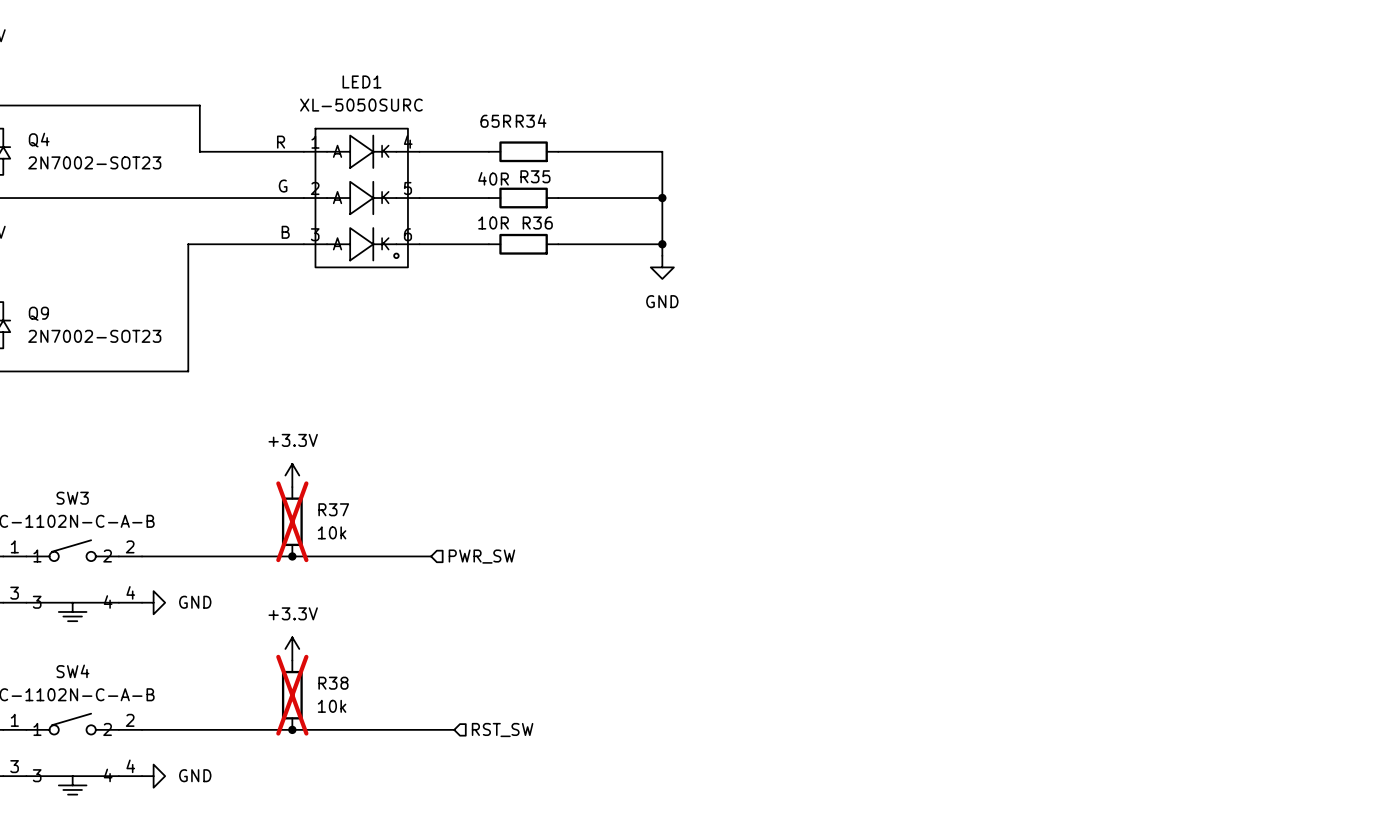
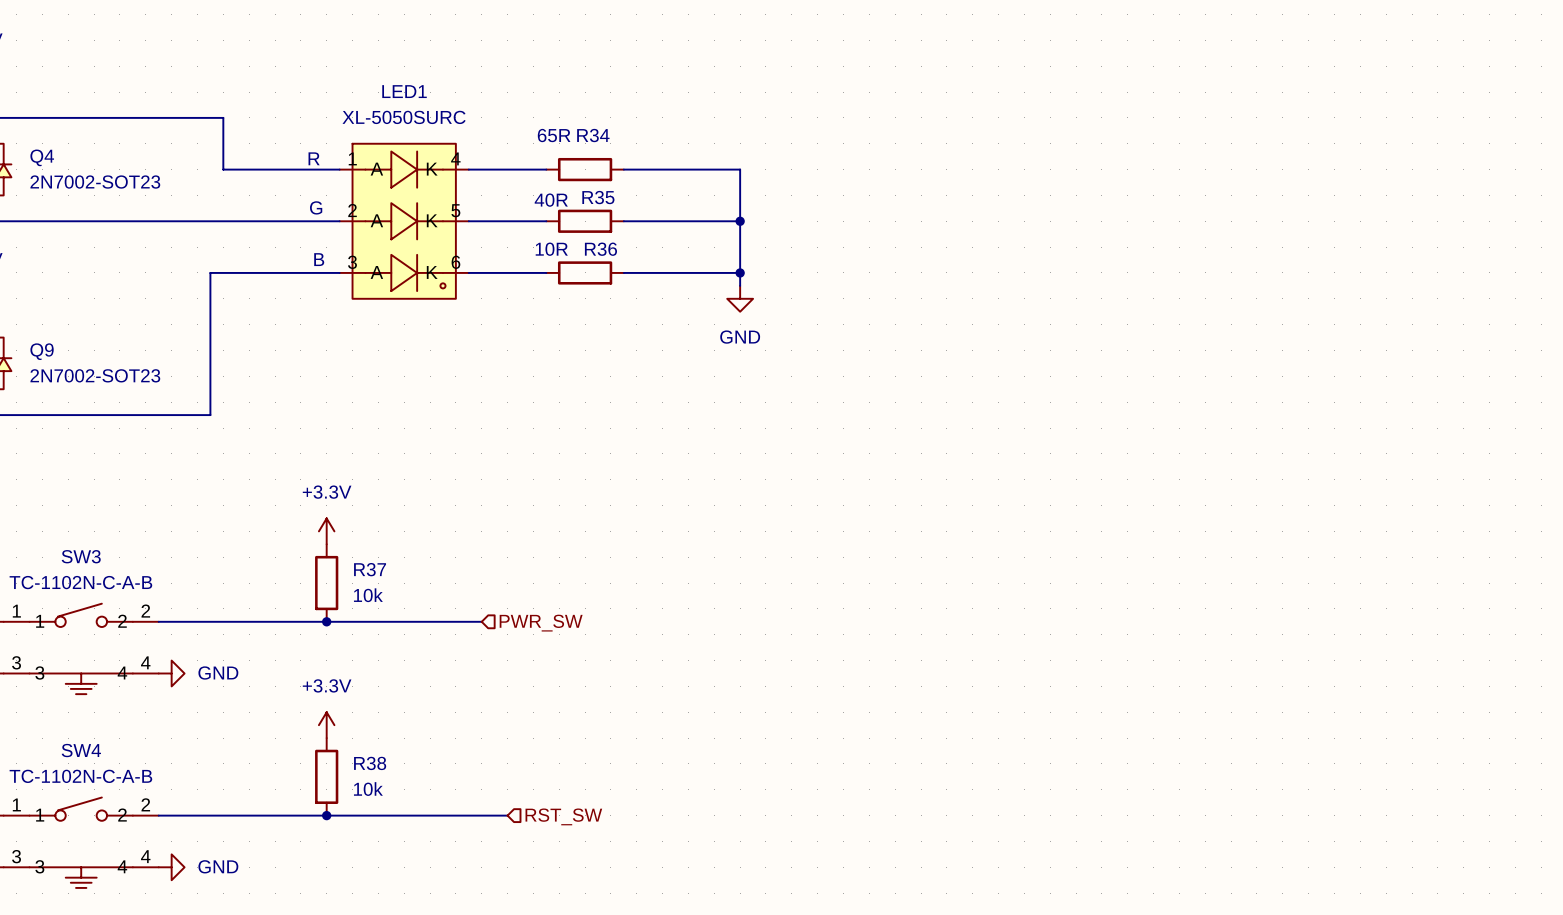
R37 do-not-place cross: (292, 521) -> none
R38 do-not-place cross: (292, 695) -> none

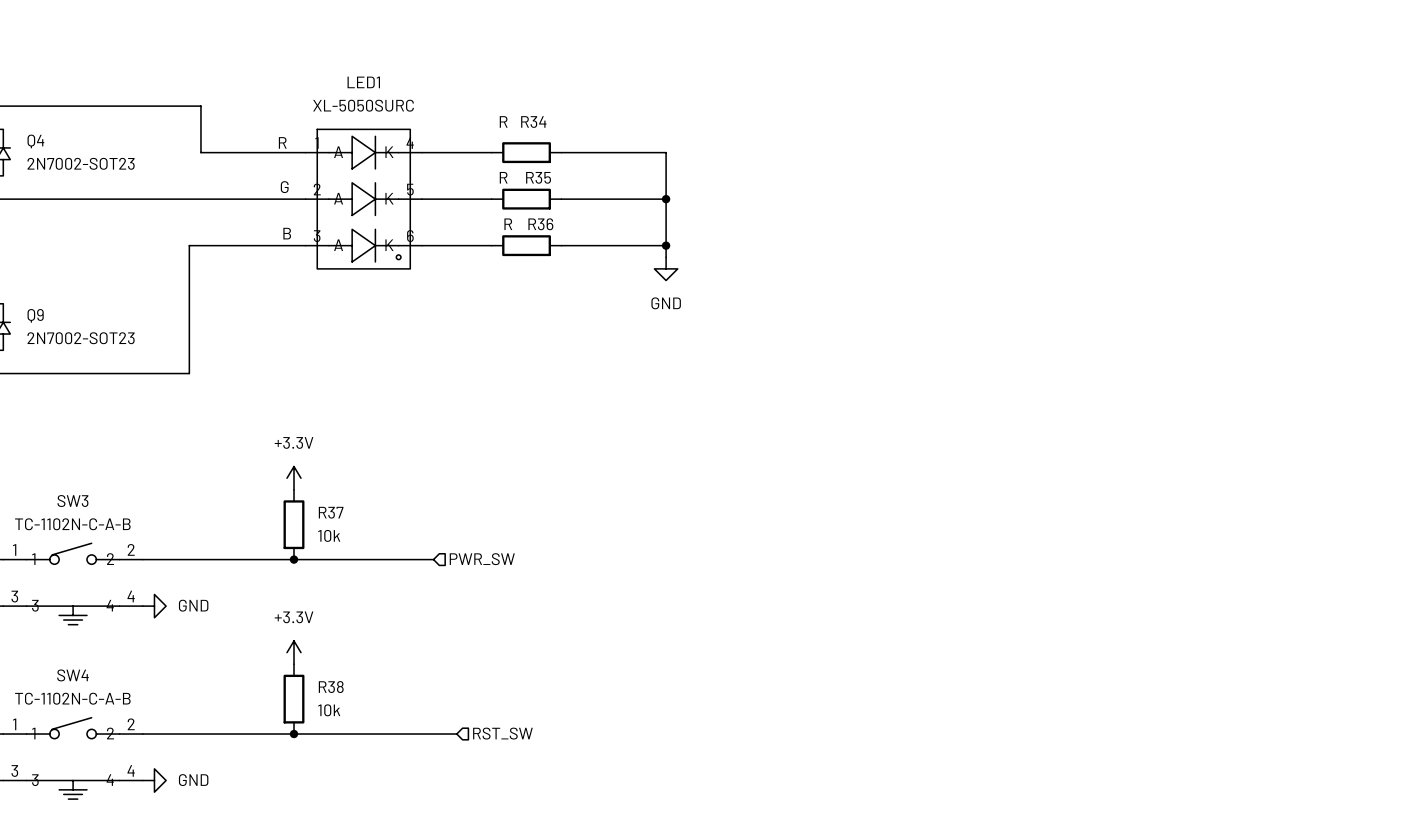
R34 value: 65R (554, 135) -> R (503, 121)
R35 value: 40R (551, 200) -> R (503, 177)
R36 value: 10R (551, 249) -> R (508, 224)

